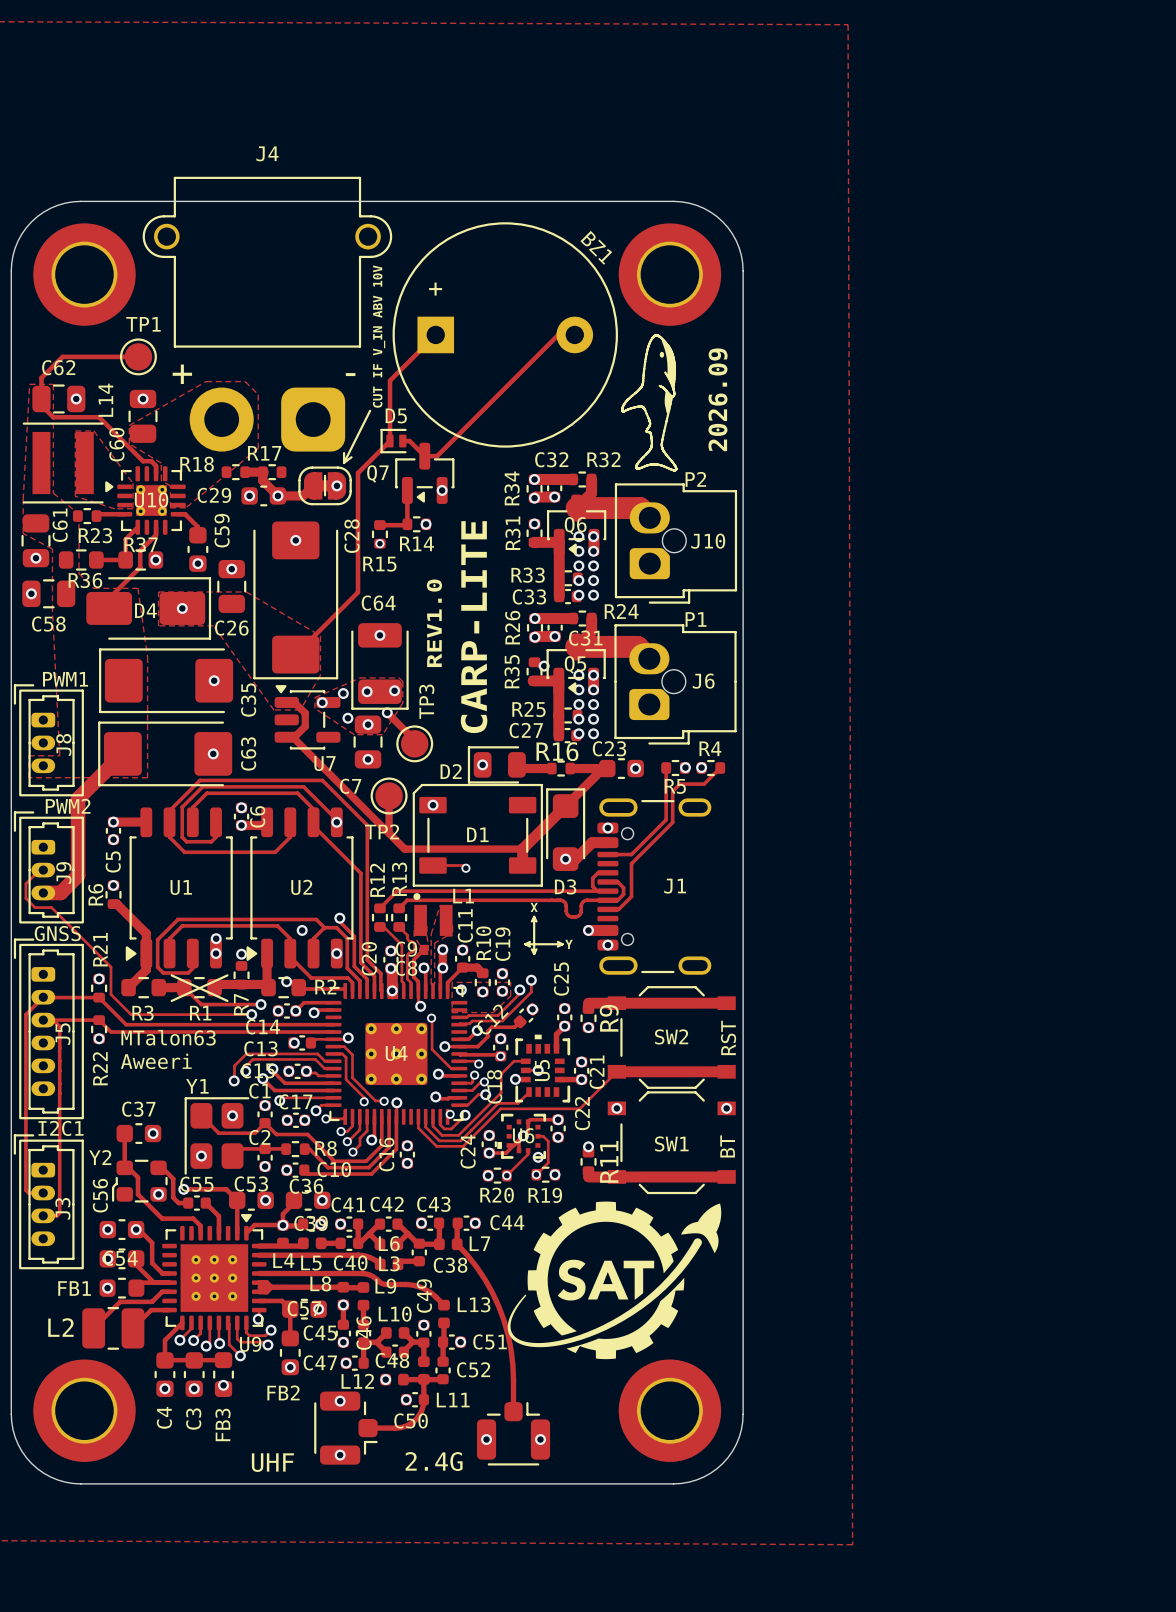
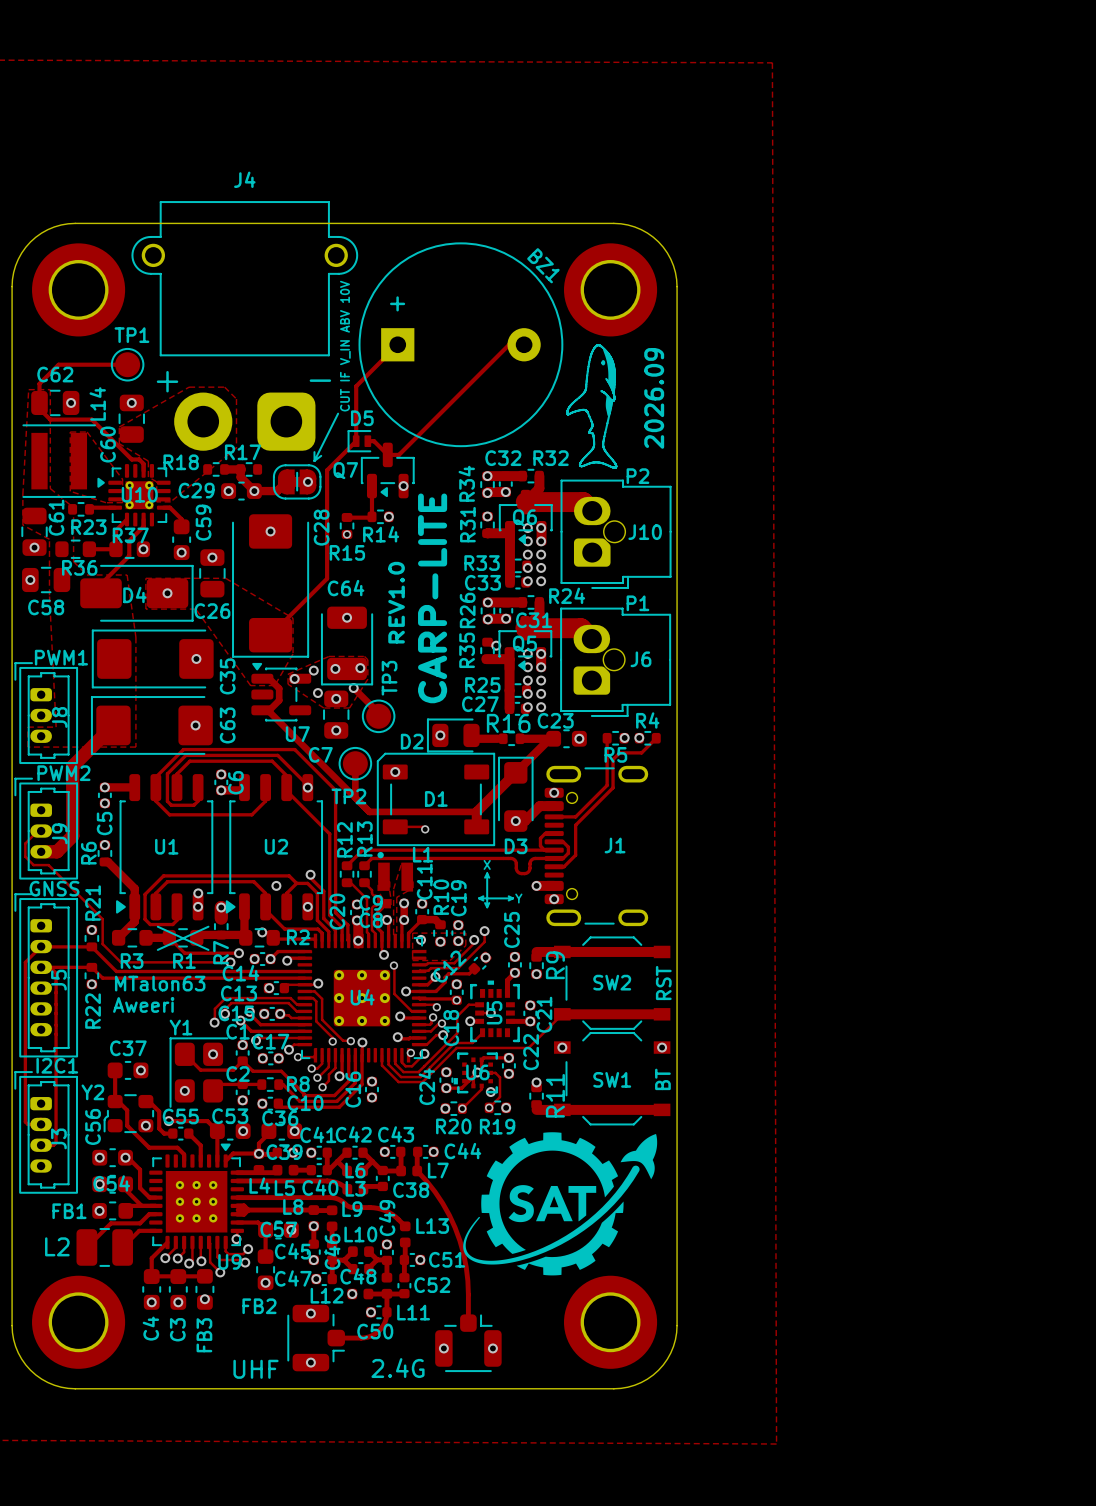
track: none -> (221, 907) (221, 918)

